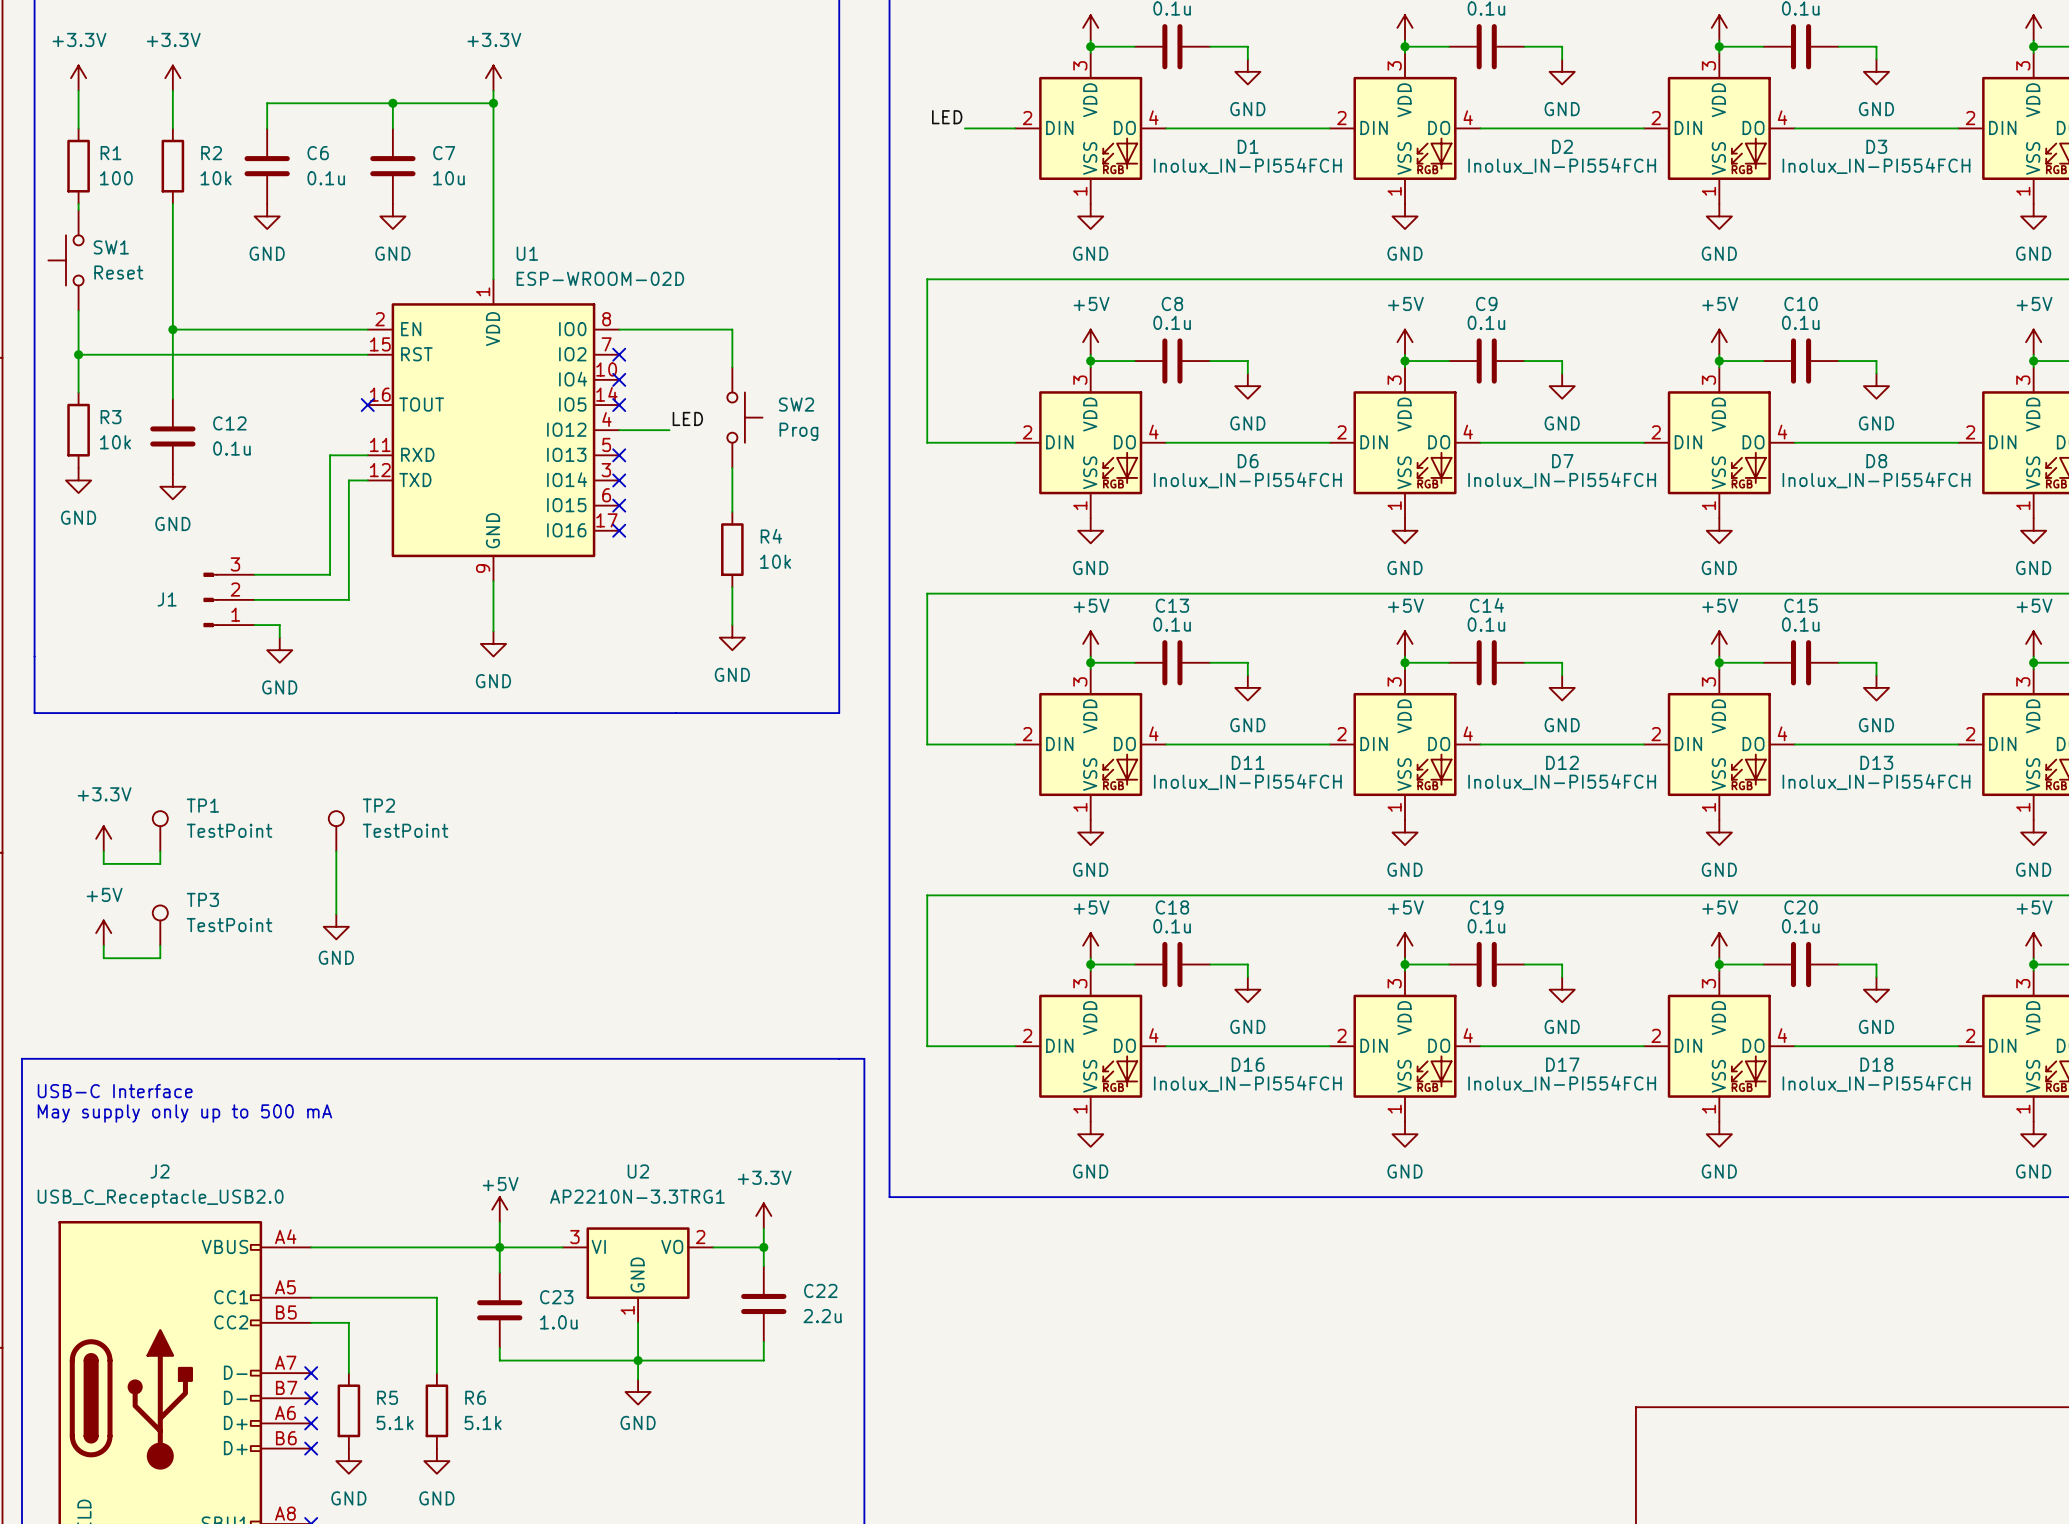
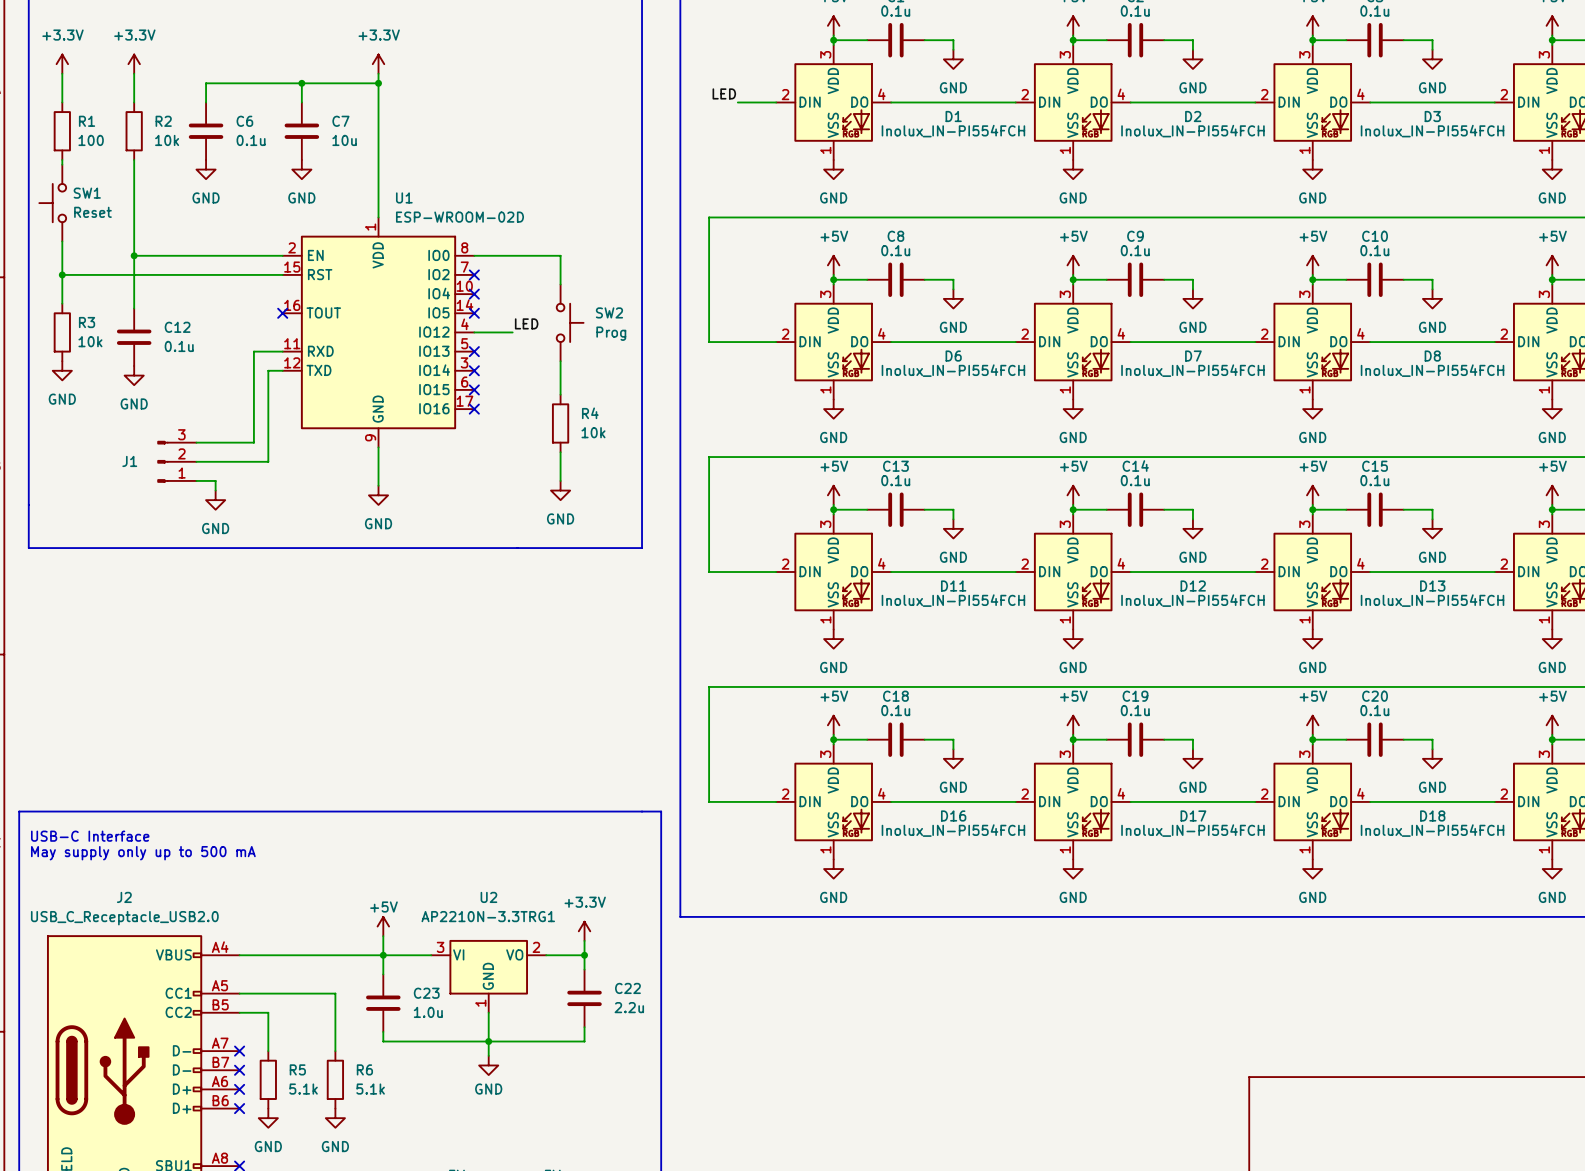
TP1: TestPoint (160, 831) -> none
TP2: TestPoint (336, 831) -> none
power symbol: +3.3V (103, 838) -> none
wire: (103, 851) (103, 863) (160, 863) (160, 851) -> none
wire: (336, 851) (336, 914) -> none
TP3: TestPoint (160, 925) -> none
power symbol: GND (336, 926) -> none
power symbol: +5V (103, 933) -> none
wire: (103, 945) (103, 958) (160, 958) (160, 945) -> none

